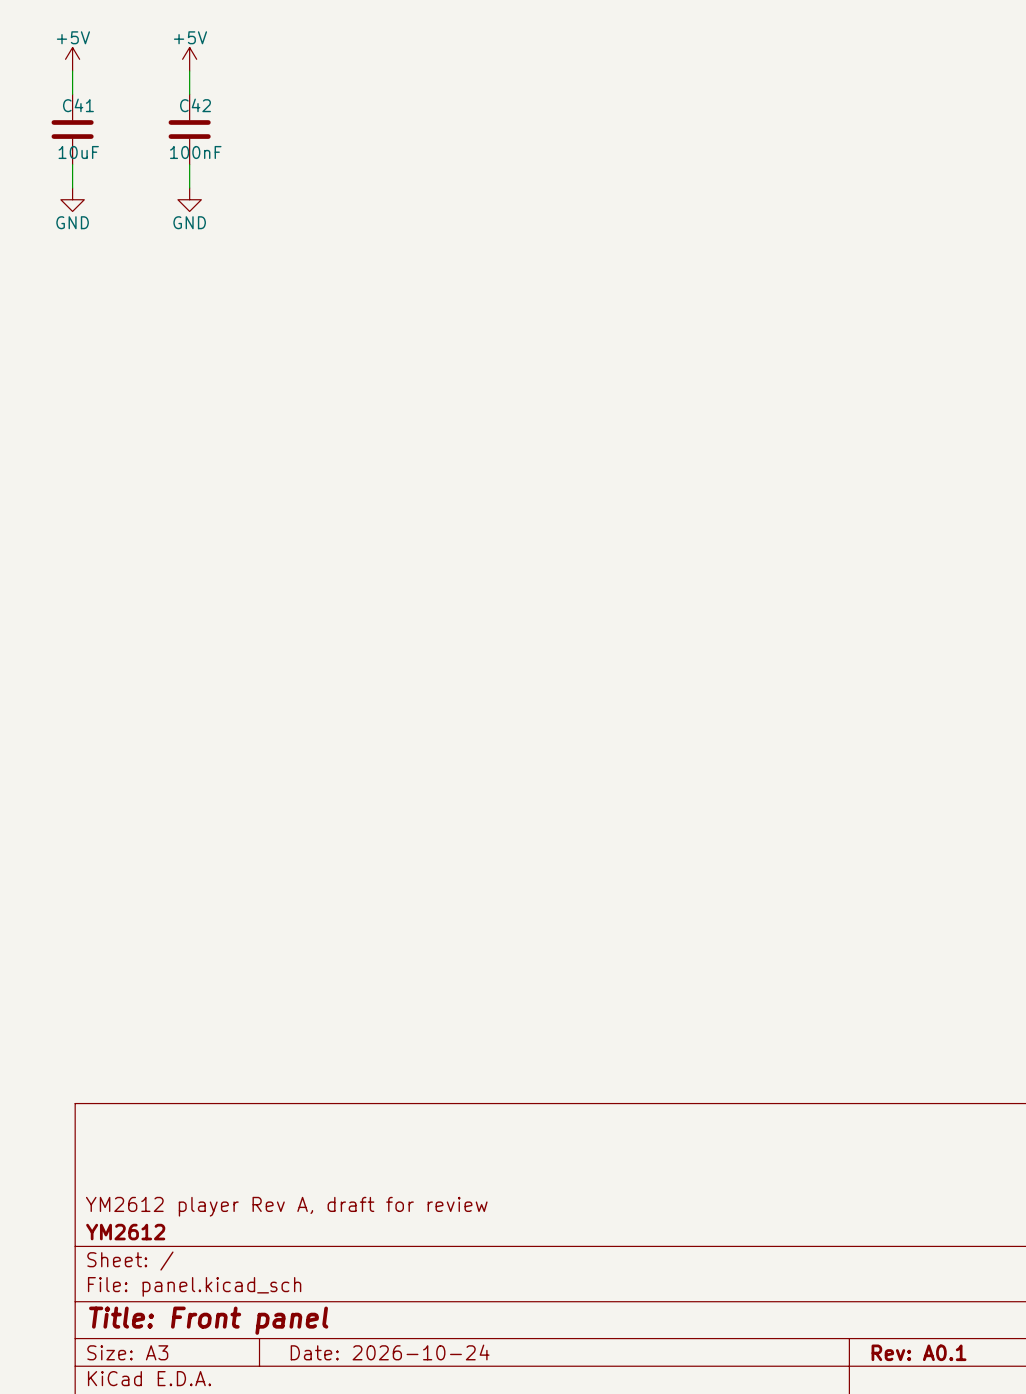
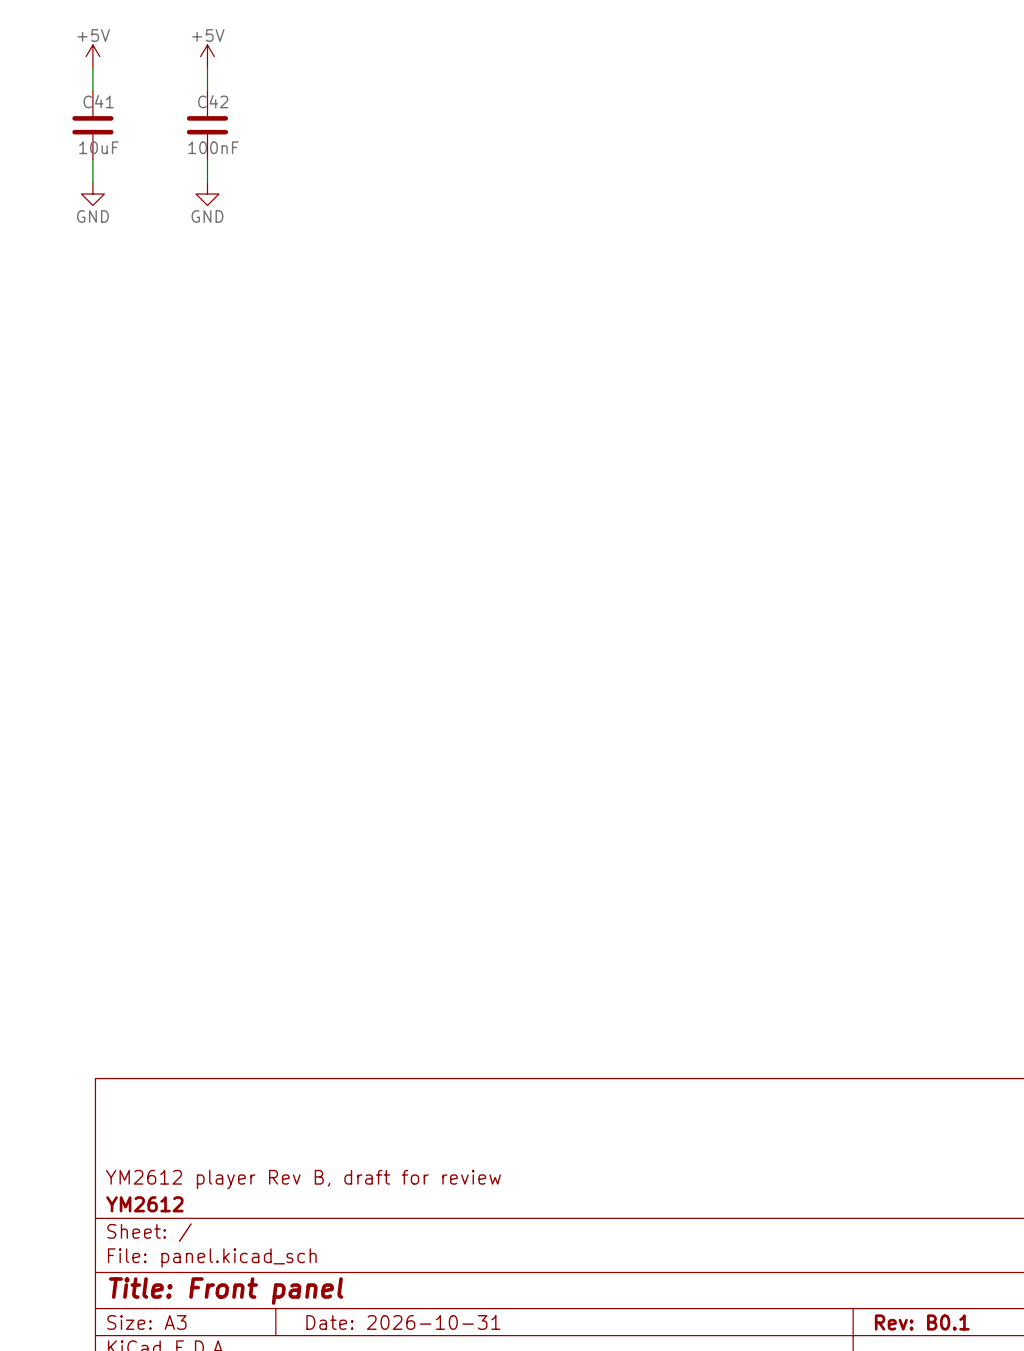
title block: YM2612 player Rev A, draft for review (286, 1206) -> YM2612 player Rev B, draft for review (303, 1179)
title block: Date: 2026-10-24 (390, 1352) -> Date: 2026-10-31 (403, 1322)
title block: Rev: A0.1 (919, 1352) -> Rev: B0.1 (922, 1322)

